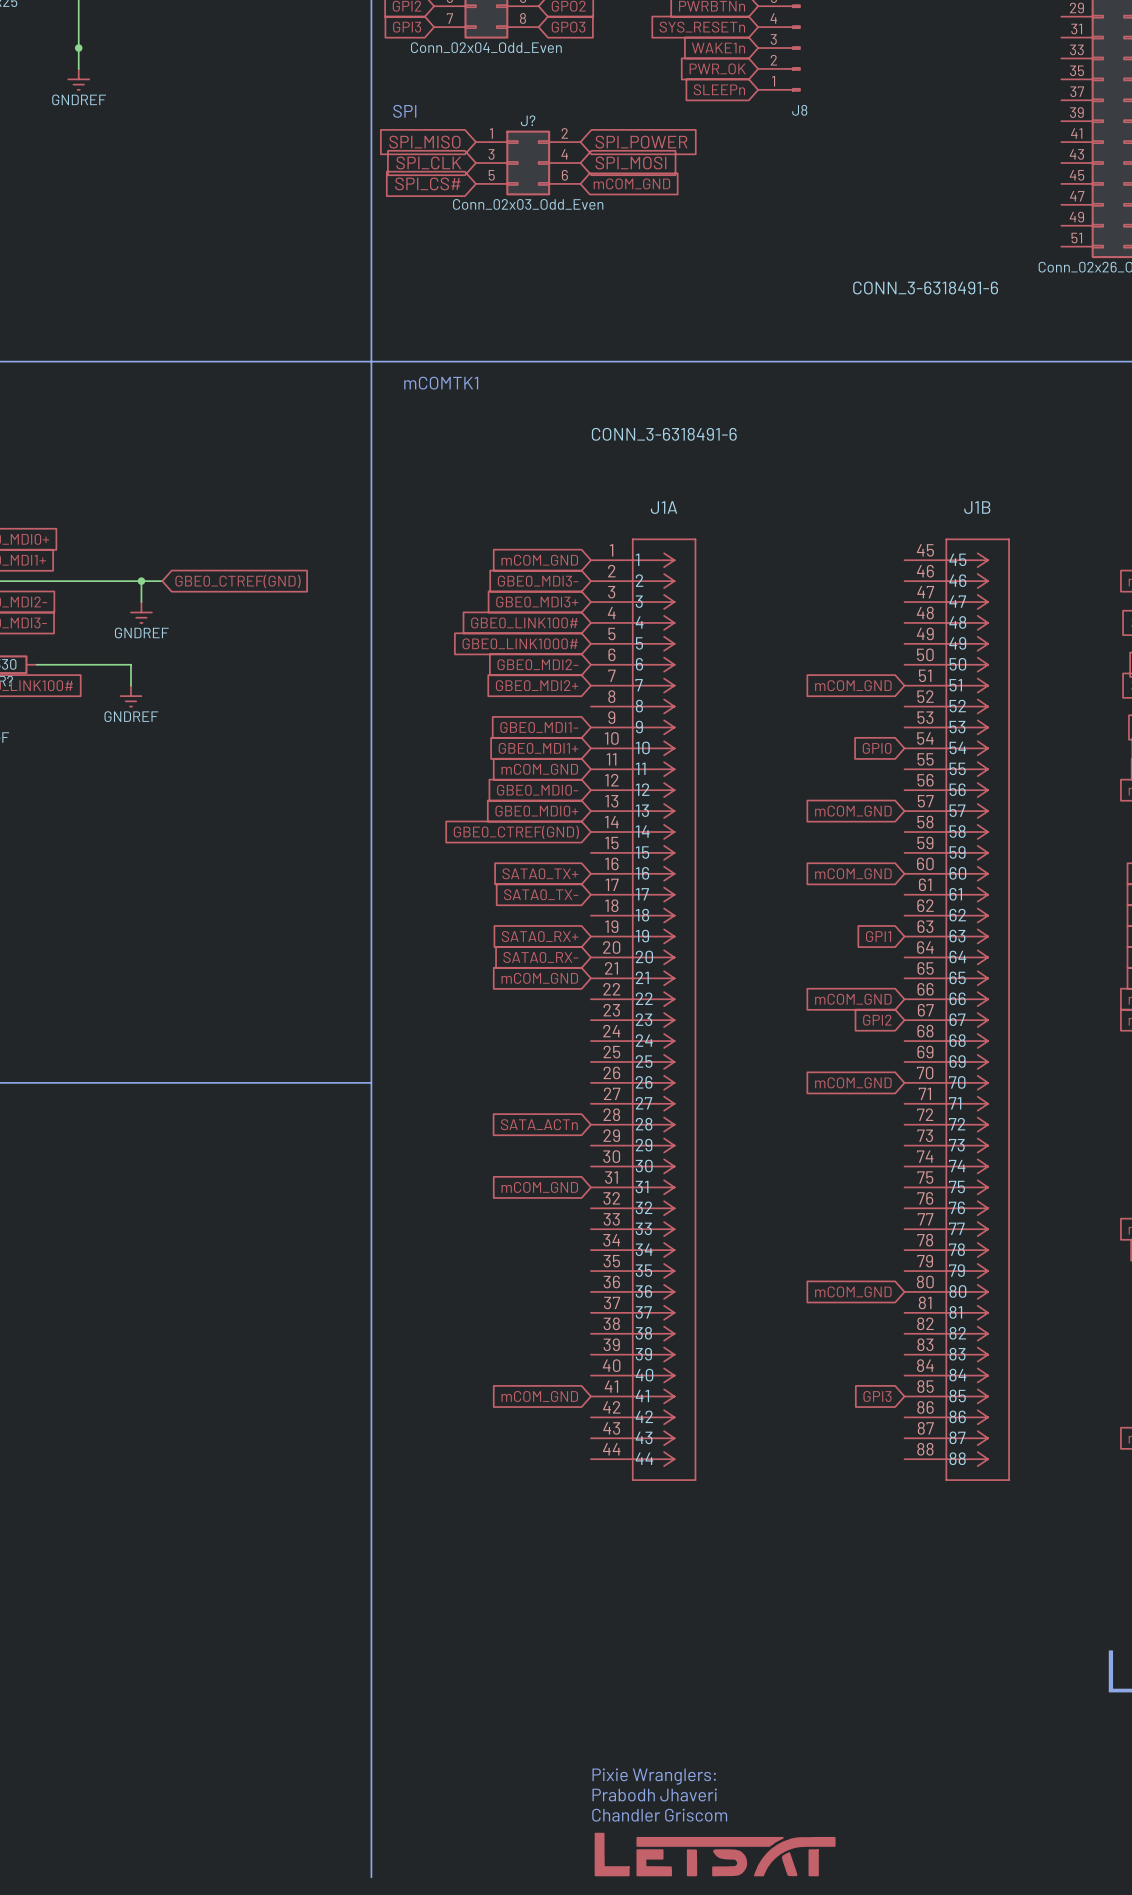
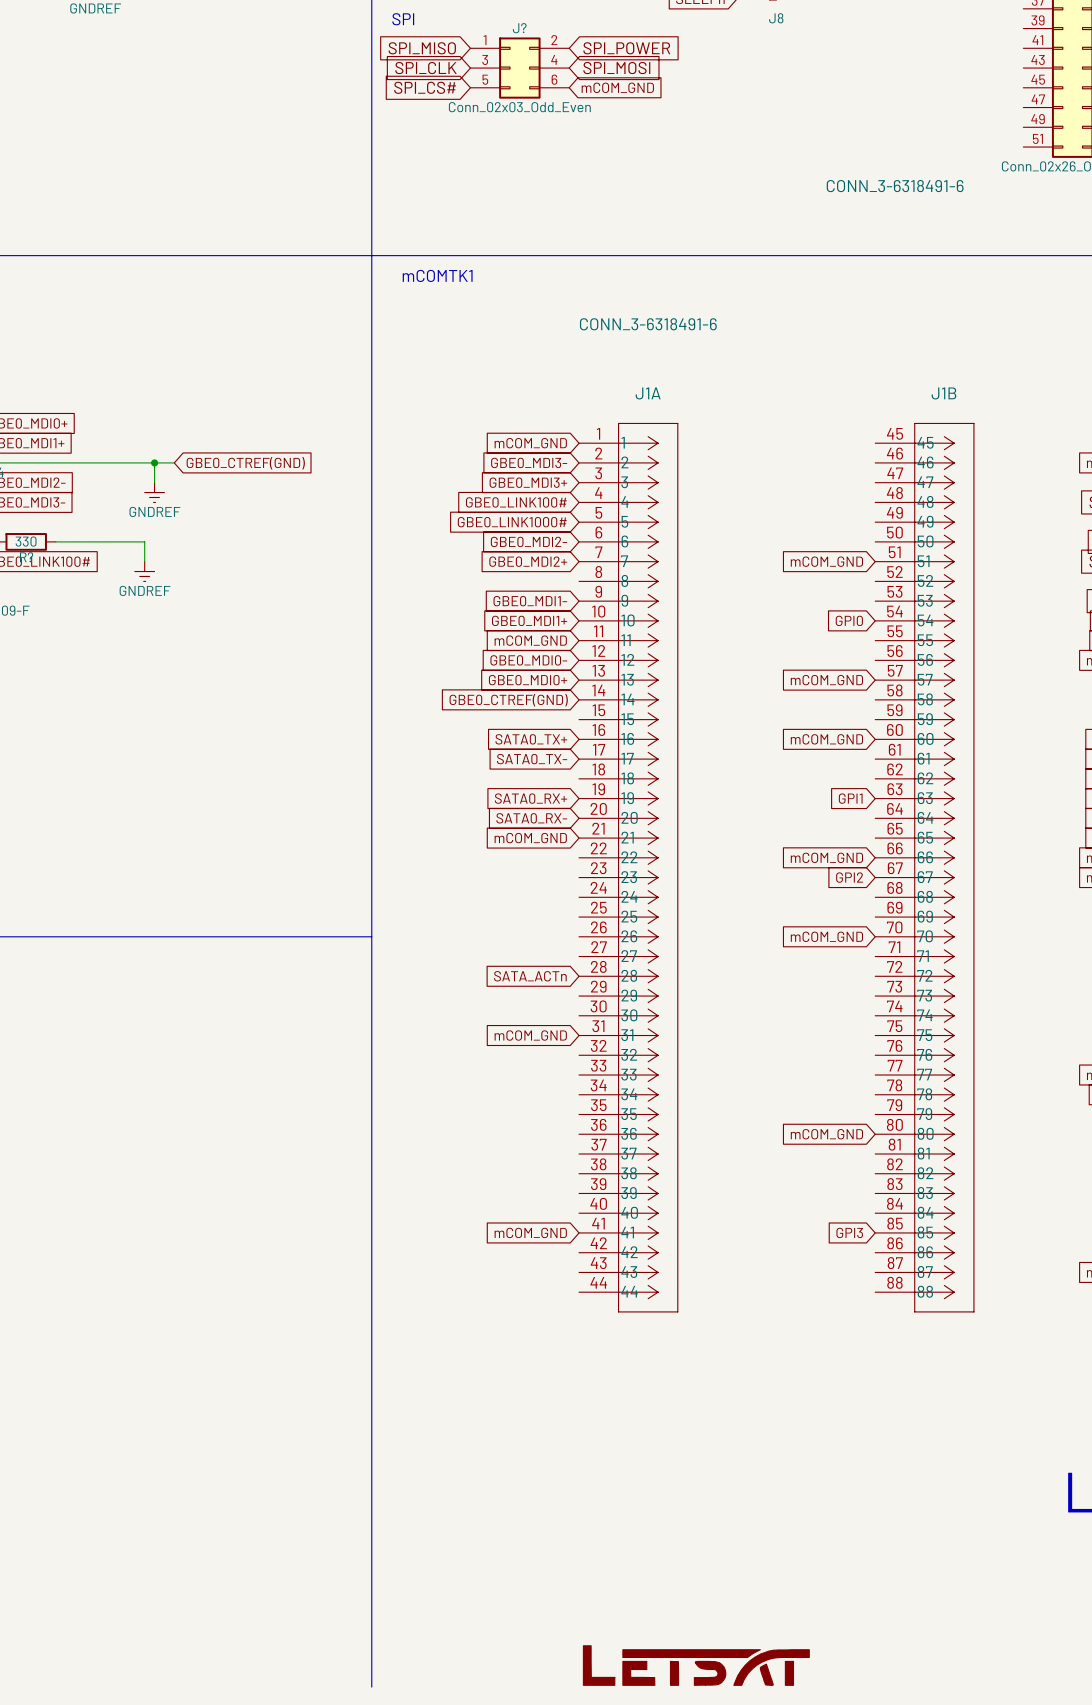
text: Pixie Wranglers: (654, 1776) -> none
text: Prabodh Jhaveri (654, 1794) -> none
text: Chandler Griscom (659, 1815) -> none

